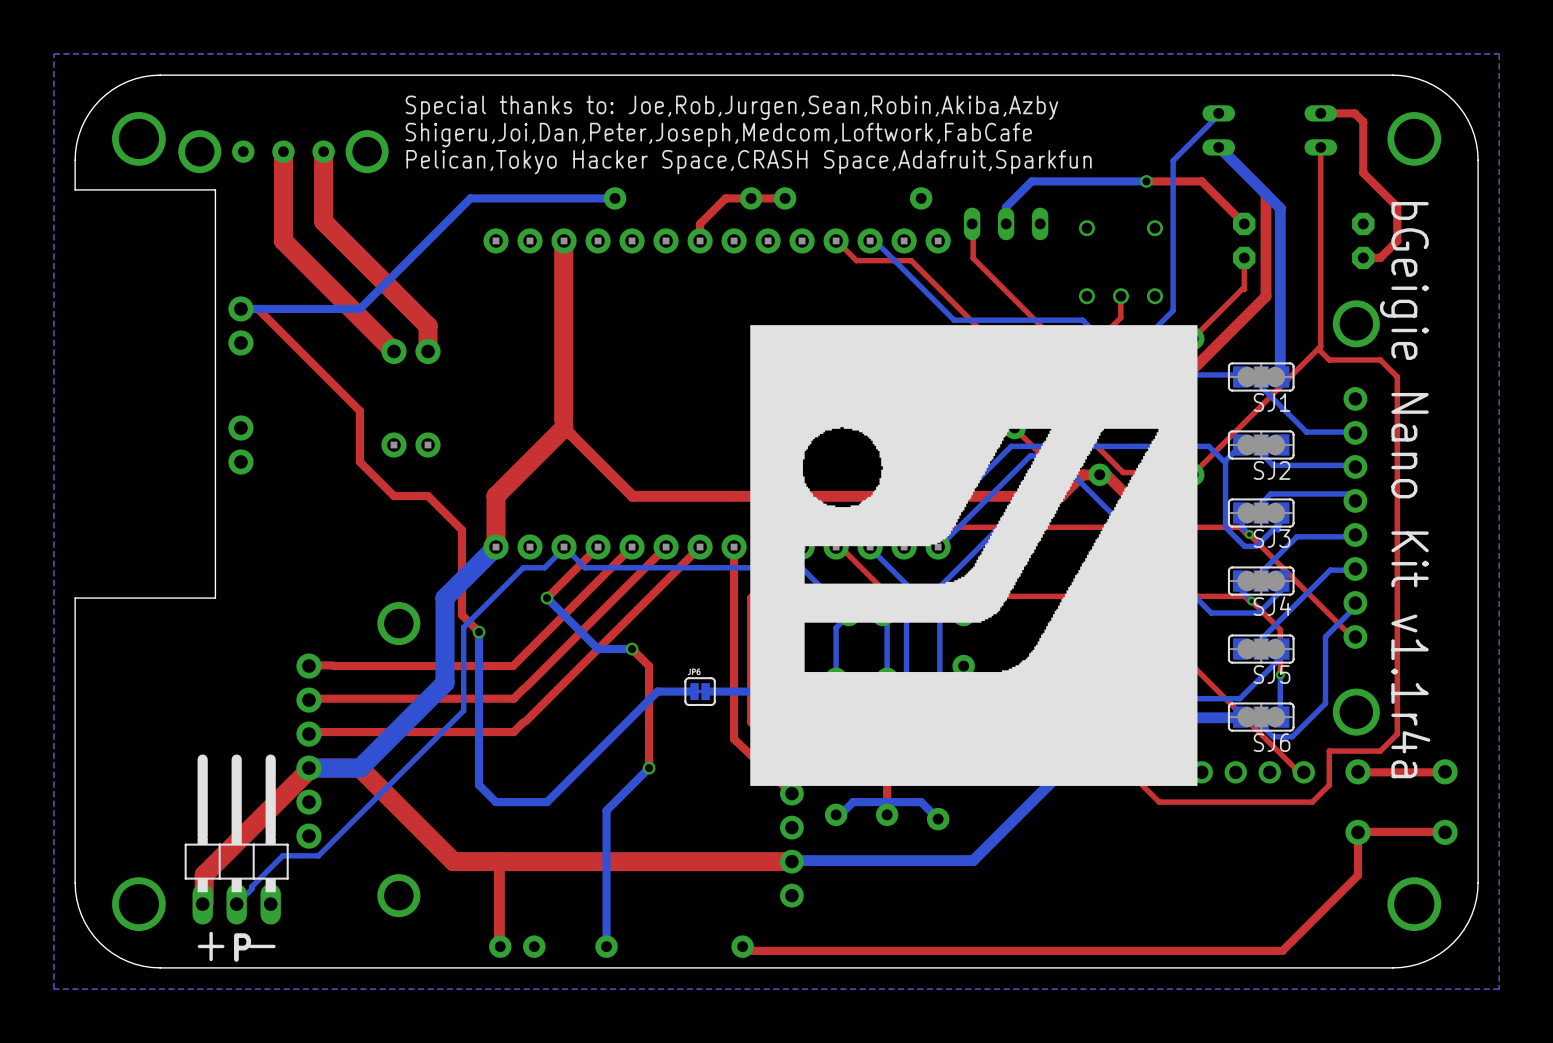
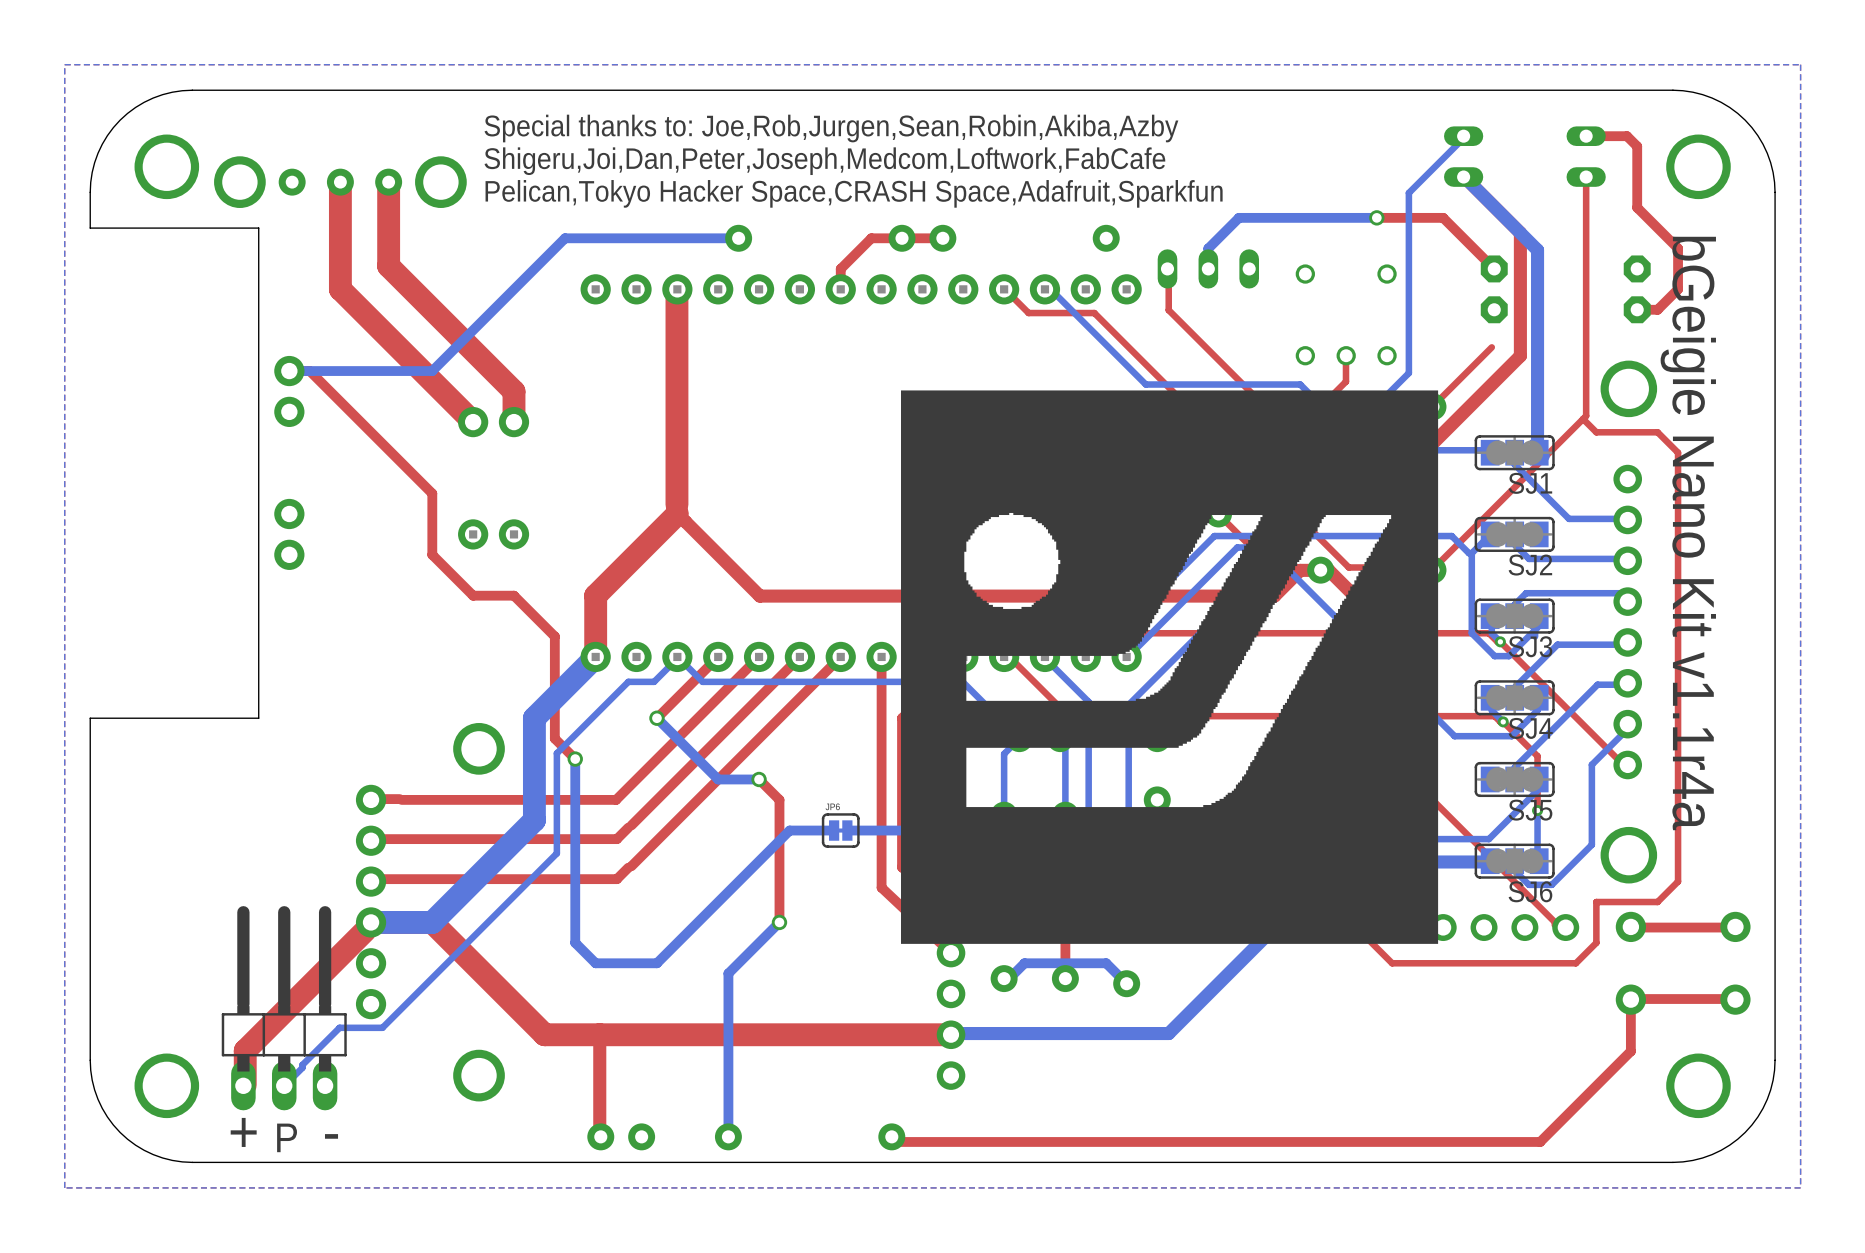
top track: (1244, 257) (1244, 289) (1242, 289) -> none

